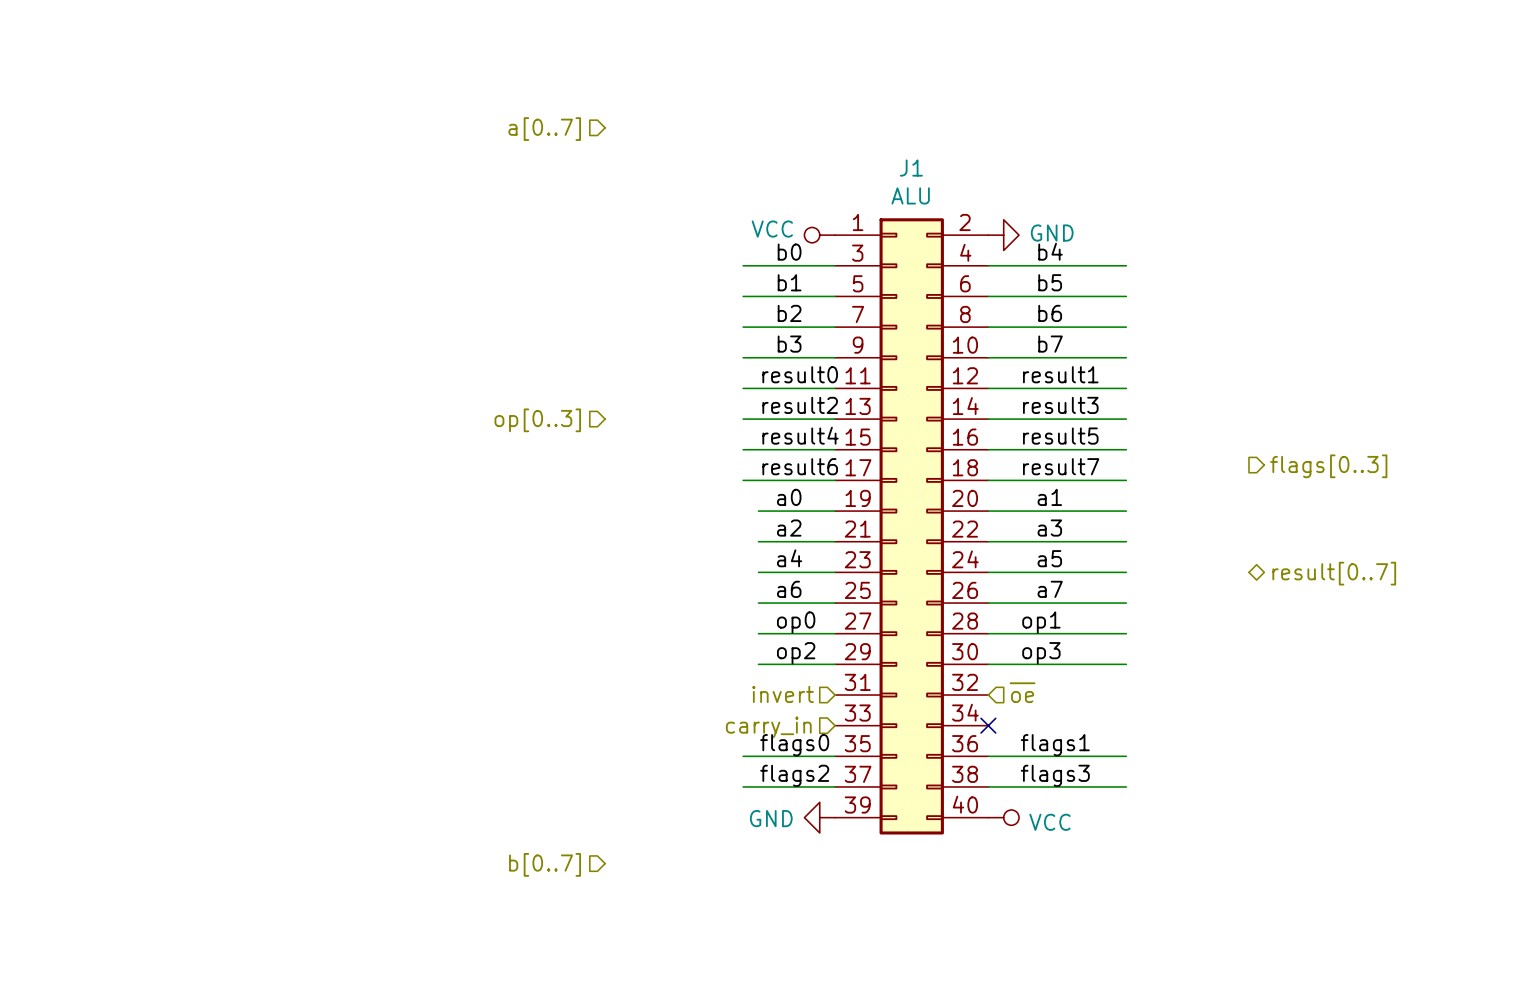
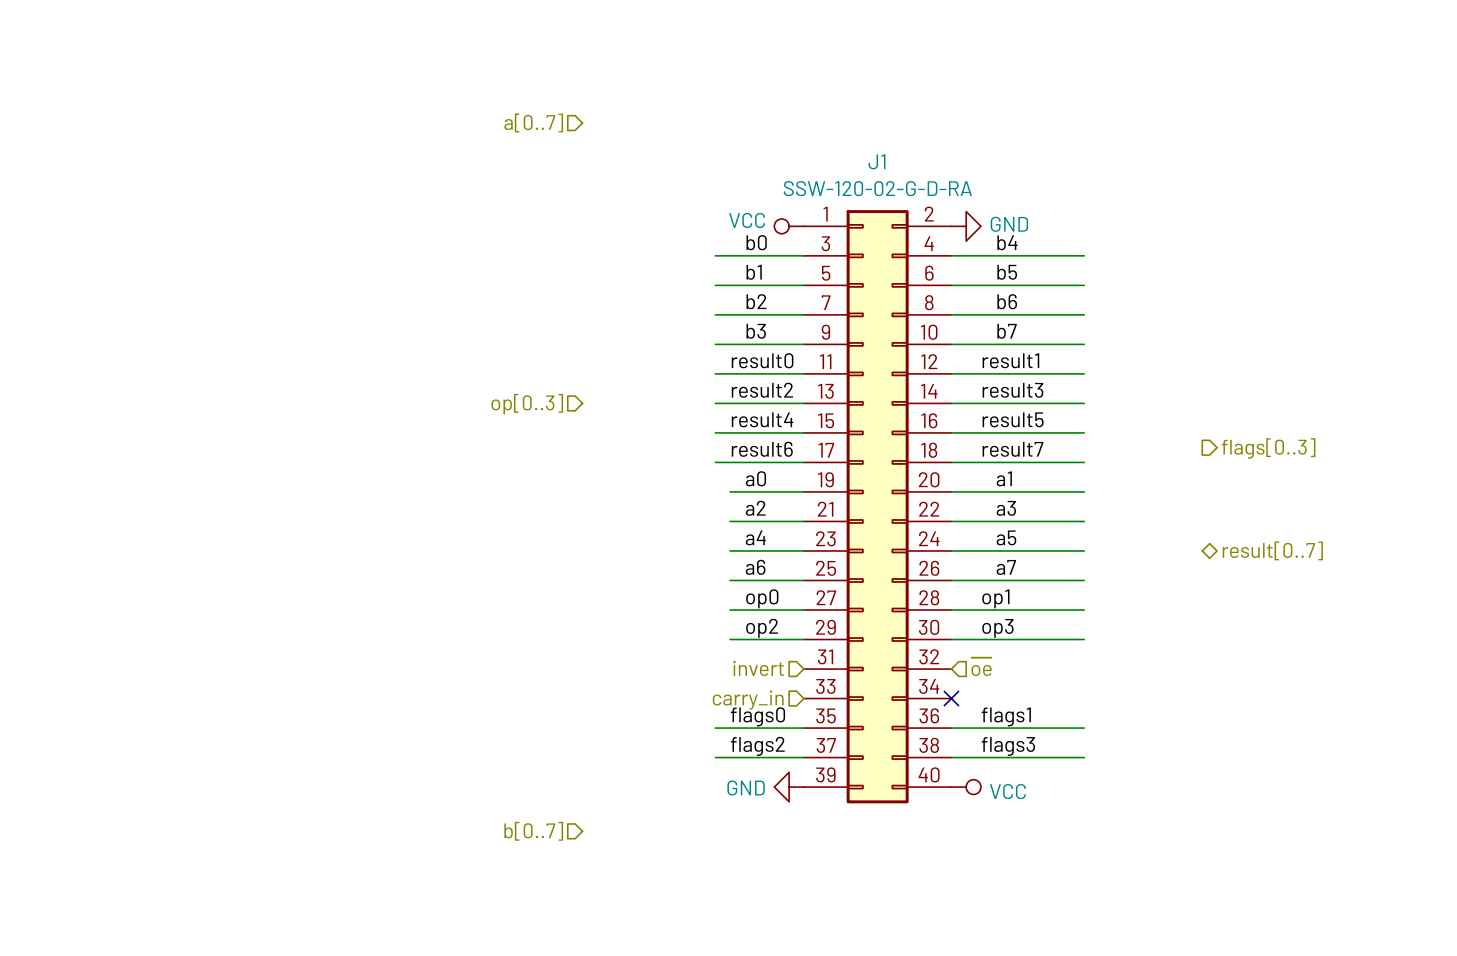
J1 value: ALU (910, 195) -> SSW-120-02-G-D-RA (877, 188)

